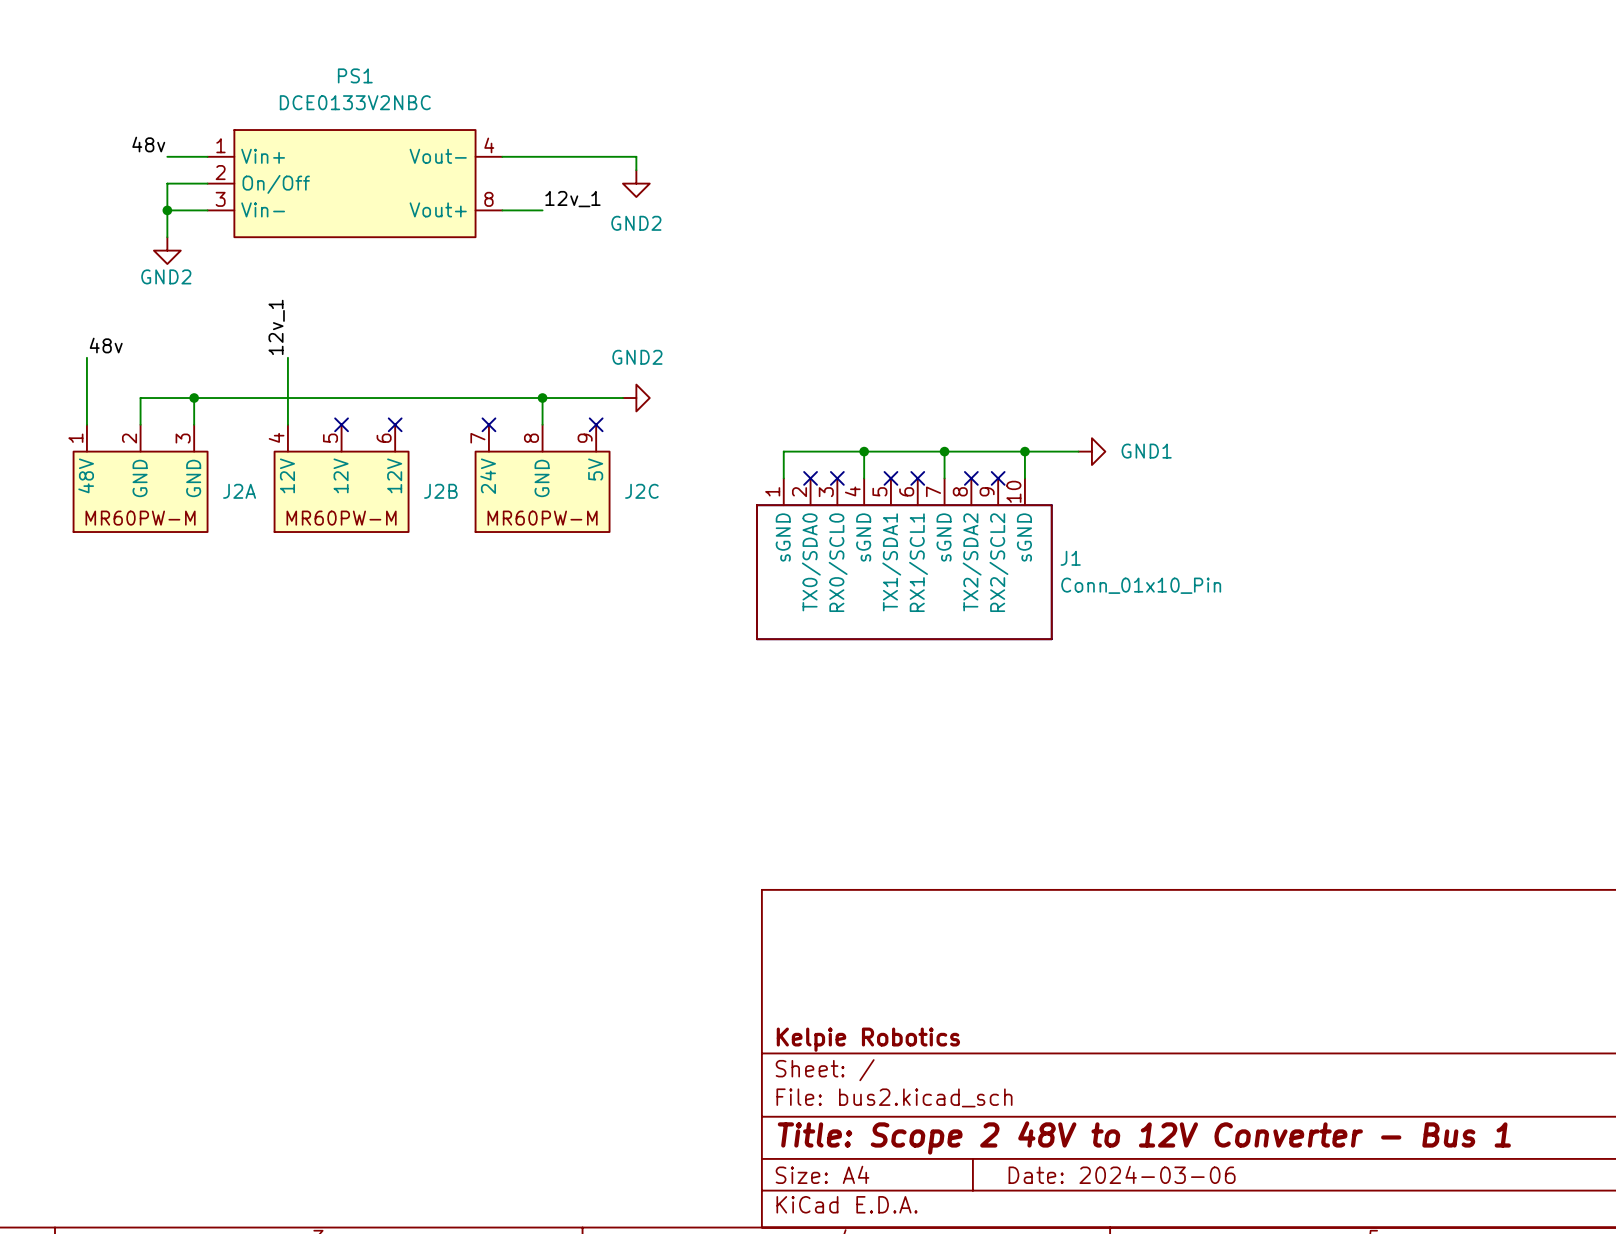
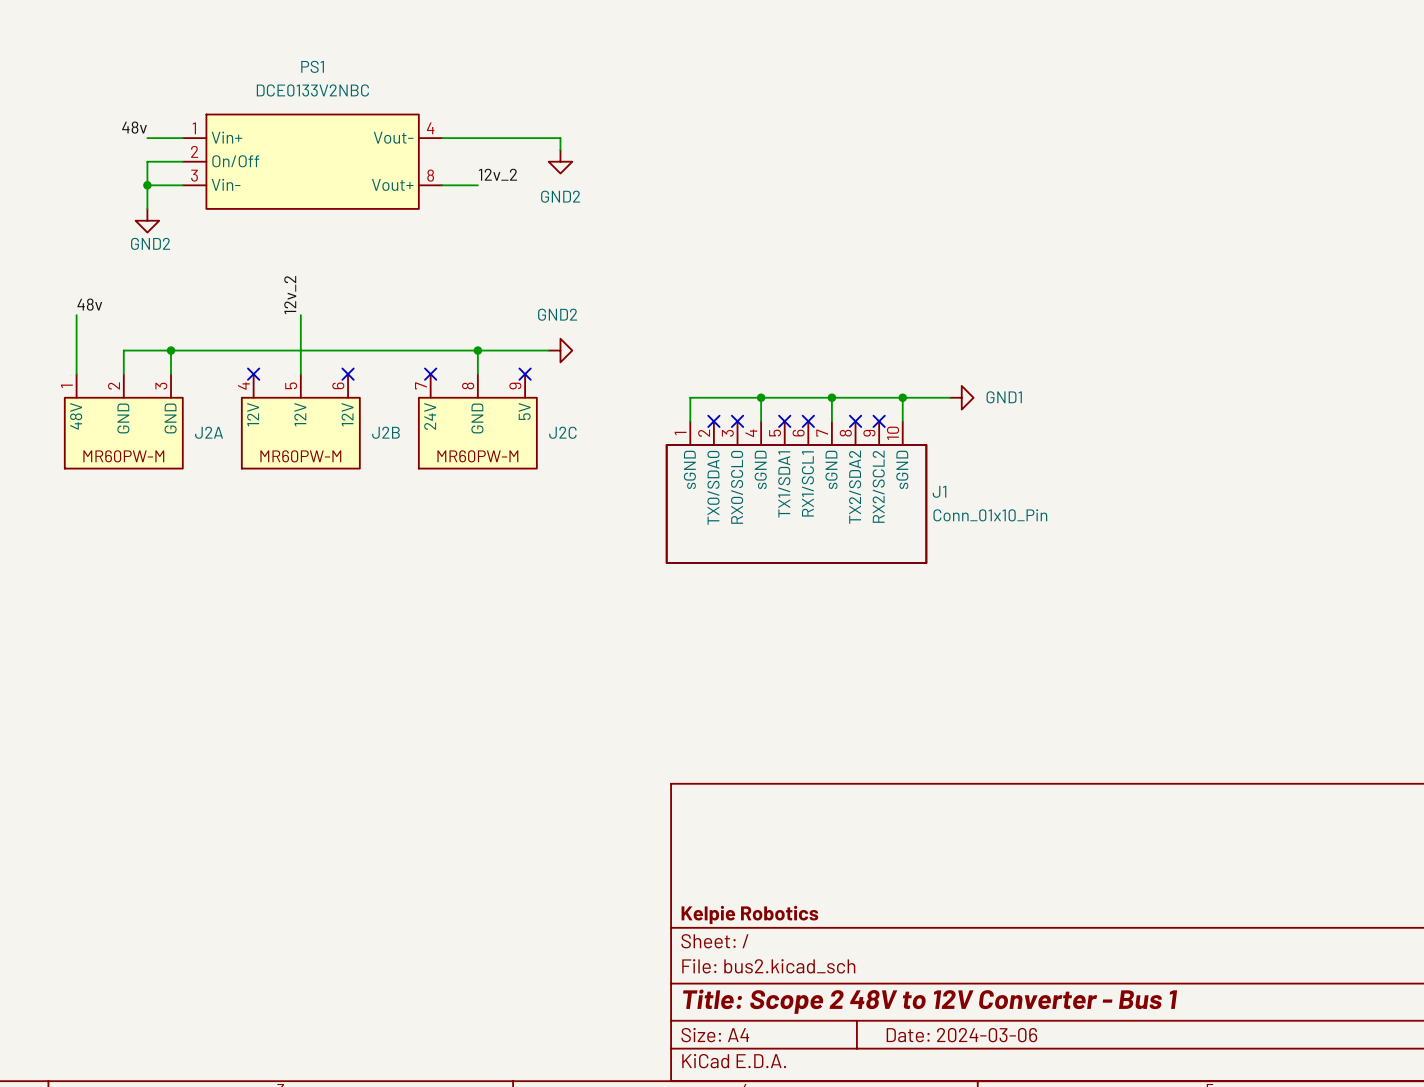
label: 12v_1 (572, 199) -> 12v_2 (497, 174)
label: 12v_1 (276, 327) -> none
label: none -> 12v_2 (290, 295)
wire: (287, 357) (287, 424) -> (300, 315) (300, 374)
no-connect mark position: (341, 424) -> (253, 374)

